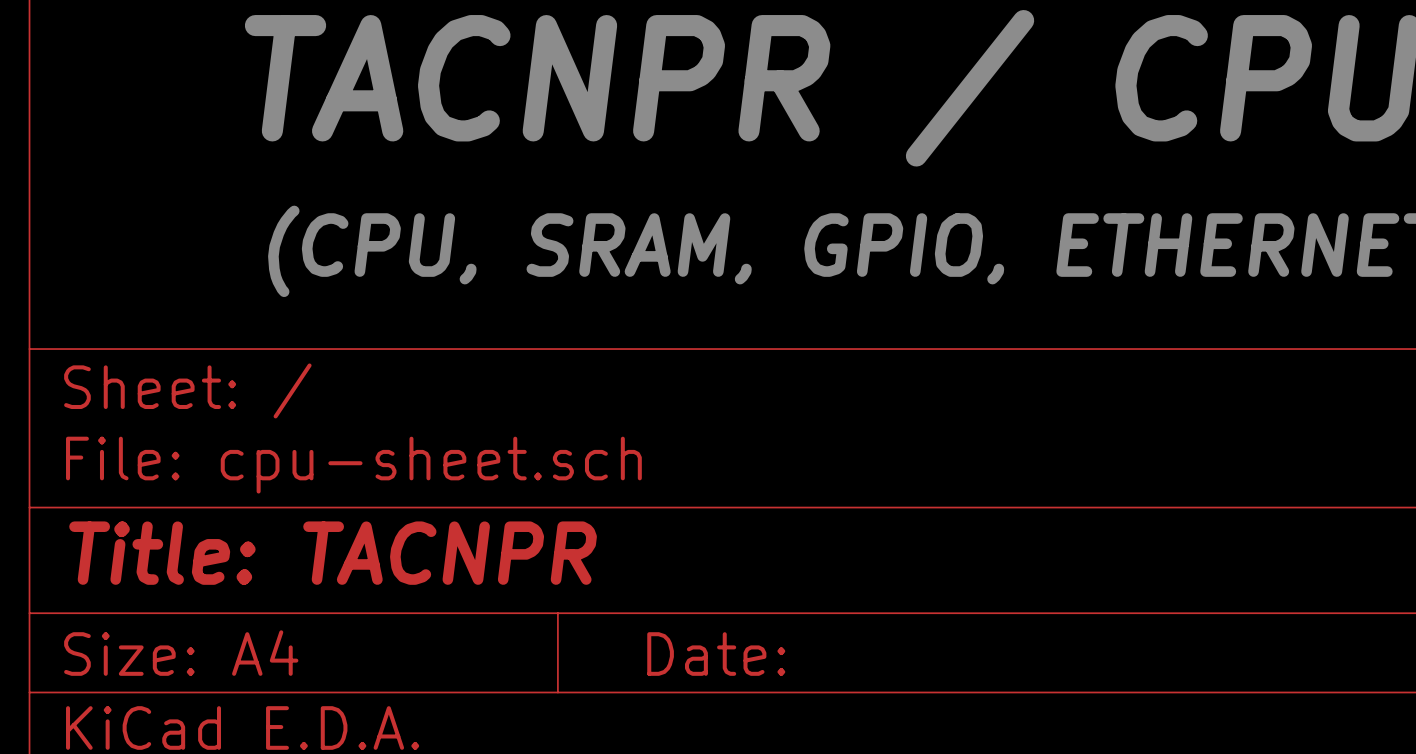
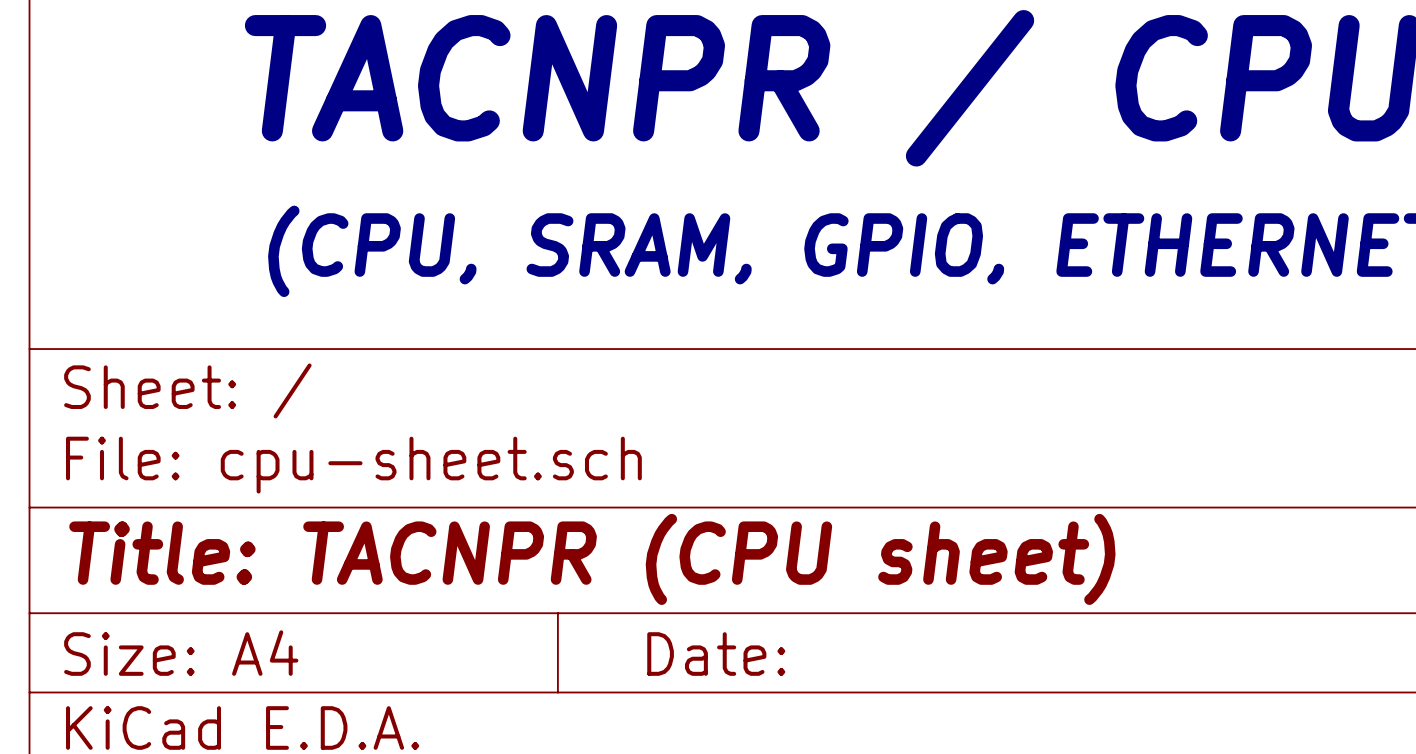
title block: Title: TACNPR (333, 553) -> Title: TACNPR (CPU sheet) (592, 559)

